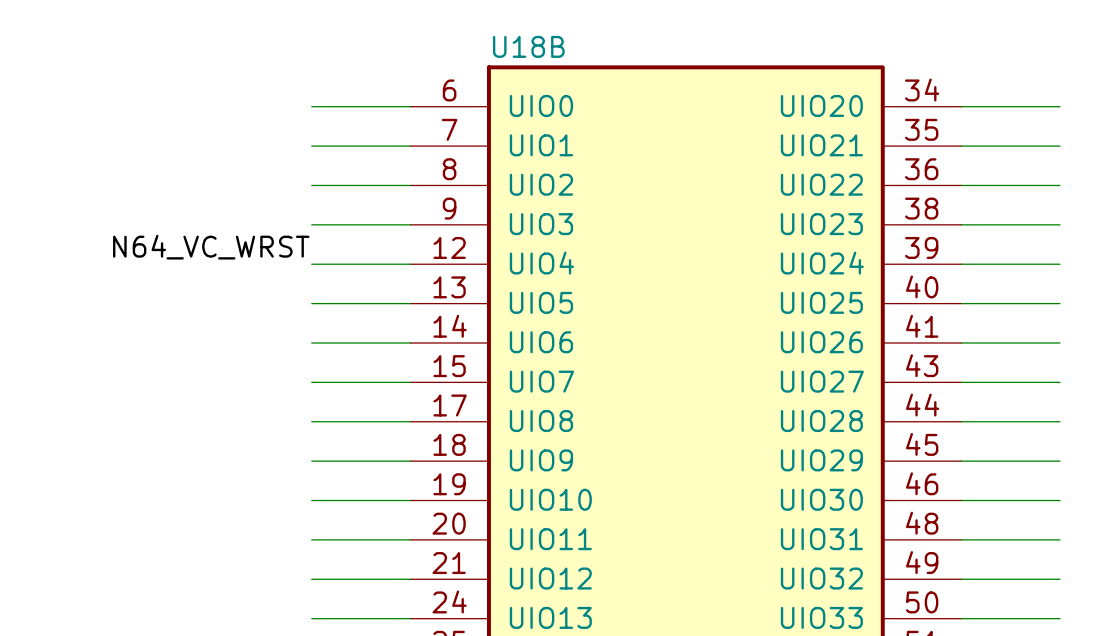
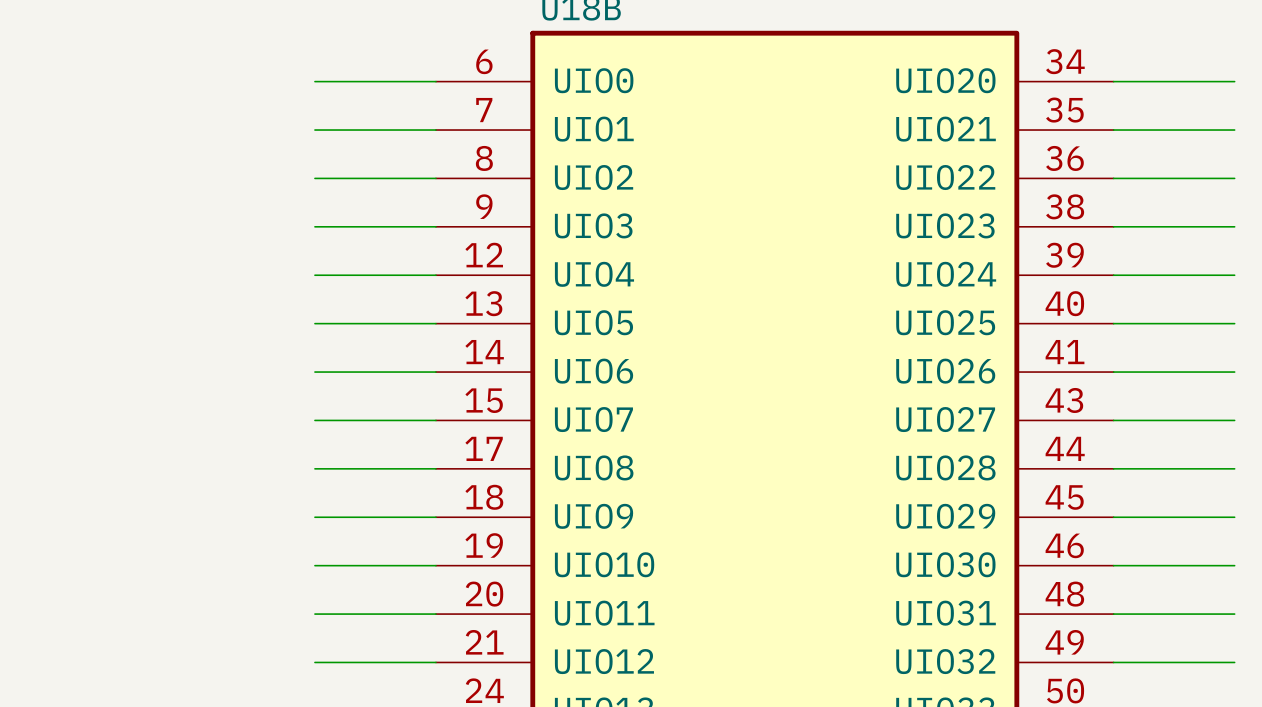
label: N64_VC_WRST (211, 247) -> none

